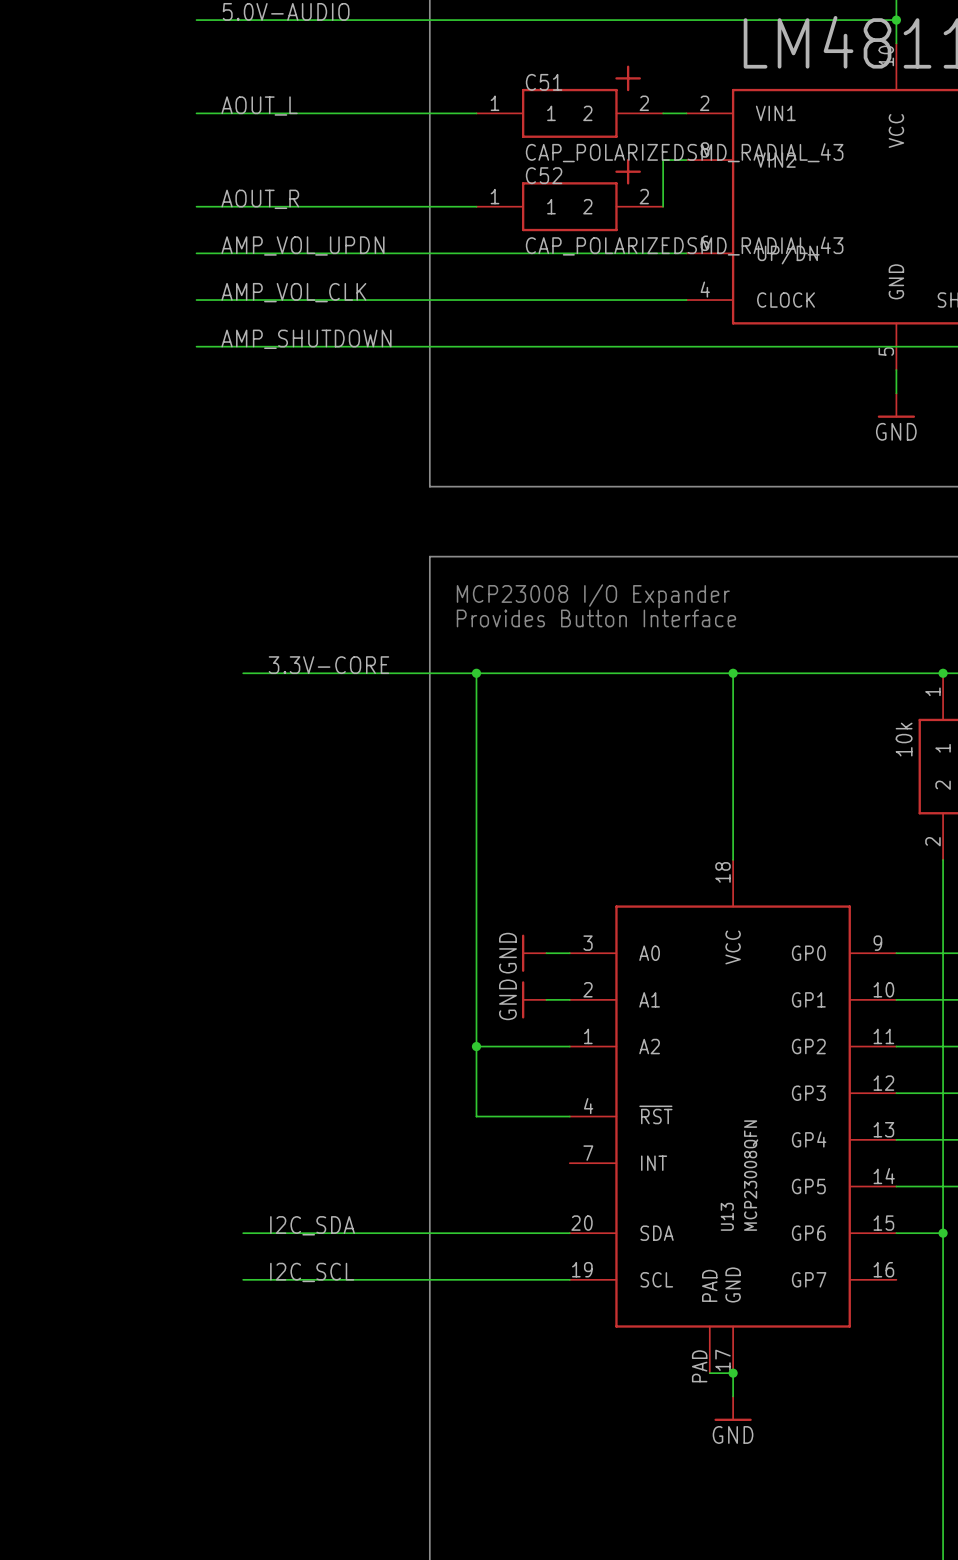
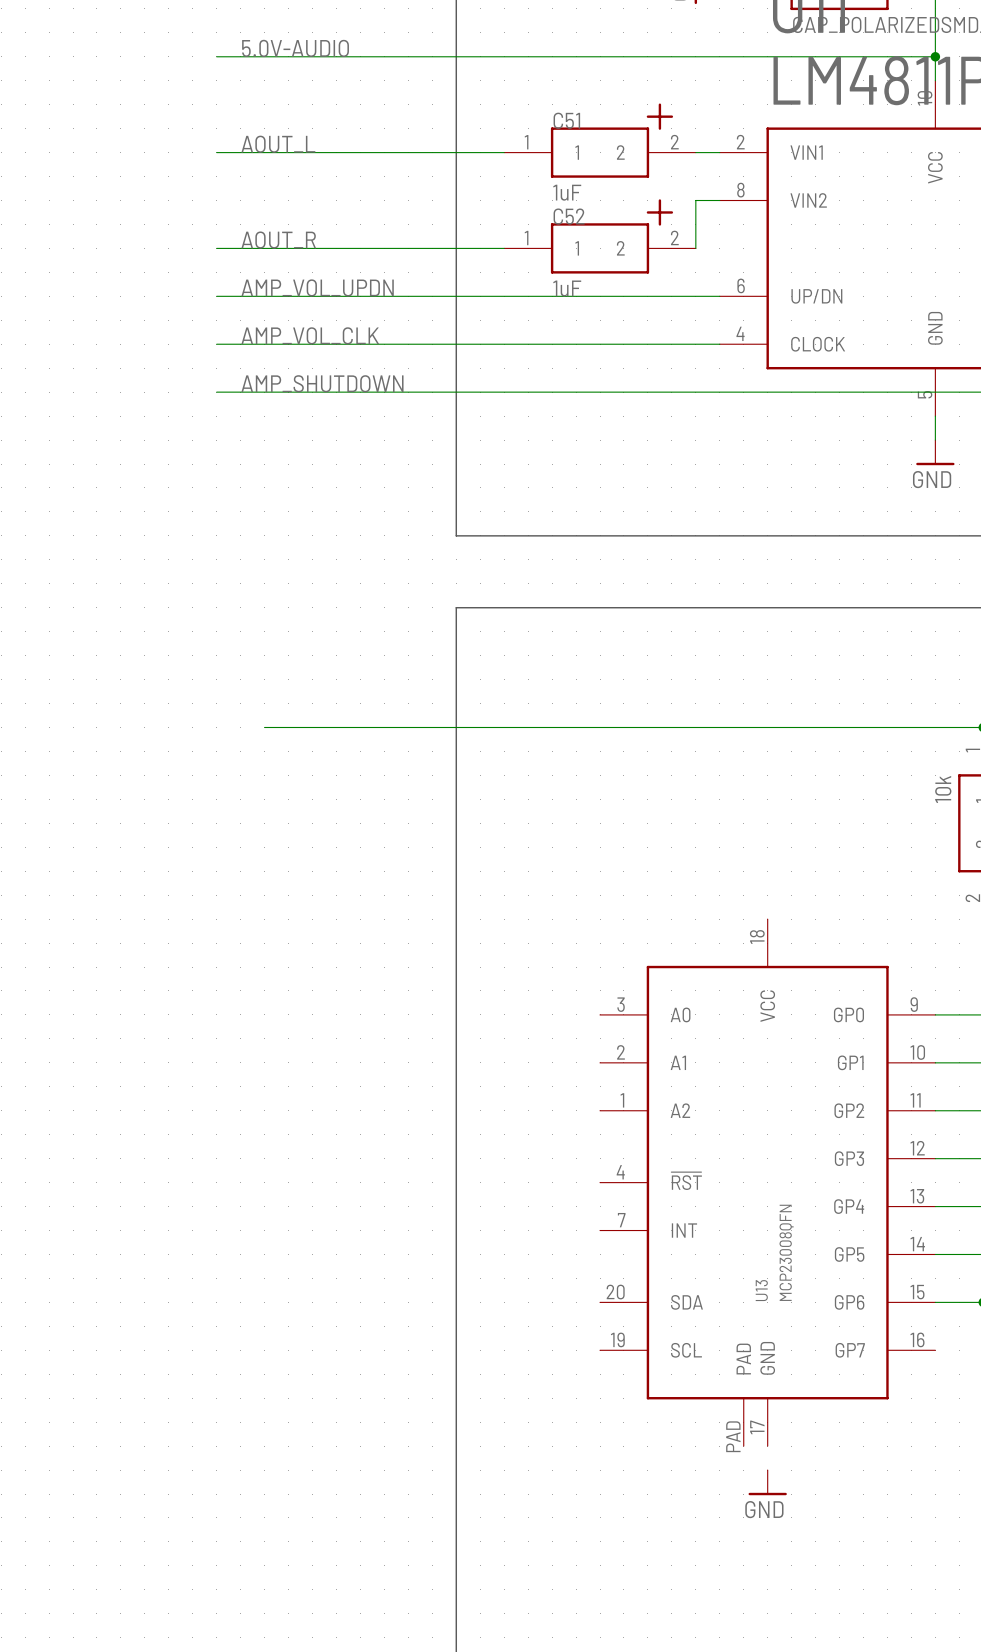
C51 value: CAP_POLARIZEDSMD_RADIAL_43 (684, 152) -> 1uF (567, 192)
C52 value: CAP_POLARIZEDSMD_RADIAL_43 (684, 246) -> 1uF (567, 288)
text: MCP23008 I/O Expander (593, 596) -> none
text: Provides Button Interface (596, 618) -> none
label: 3.3V-CORE (328, 665) -> none
wire: (476, 673) (476, 1116) (569, 1116) -> none
junction: (476, 673) -> none
wire: (733, 673) (733, 859) -> none
junction: (733, 673) -> none
power symbol: GND (534, 953) -> none
wire: (546, 953) (569, 953) -> none
power symbol: GND (534, 999) -> none
wire: (546, 999) (569, 999) -> none
wire: (476, 1046) (569, 1046) -> none
junction: (476, 1046) -> none
label: I2C_SDA (312, 1225) -> none
wire: (243, 1233) (569, 1233) -> none
label: I2C_SCL (312, 1272) -> none
wire: (243, 1279) (569, 1279) -> none
wire: (709, 1373) (733, 1373) (733, 1396) -> none
junction: (733, 1373) -> none

